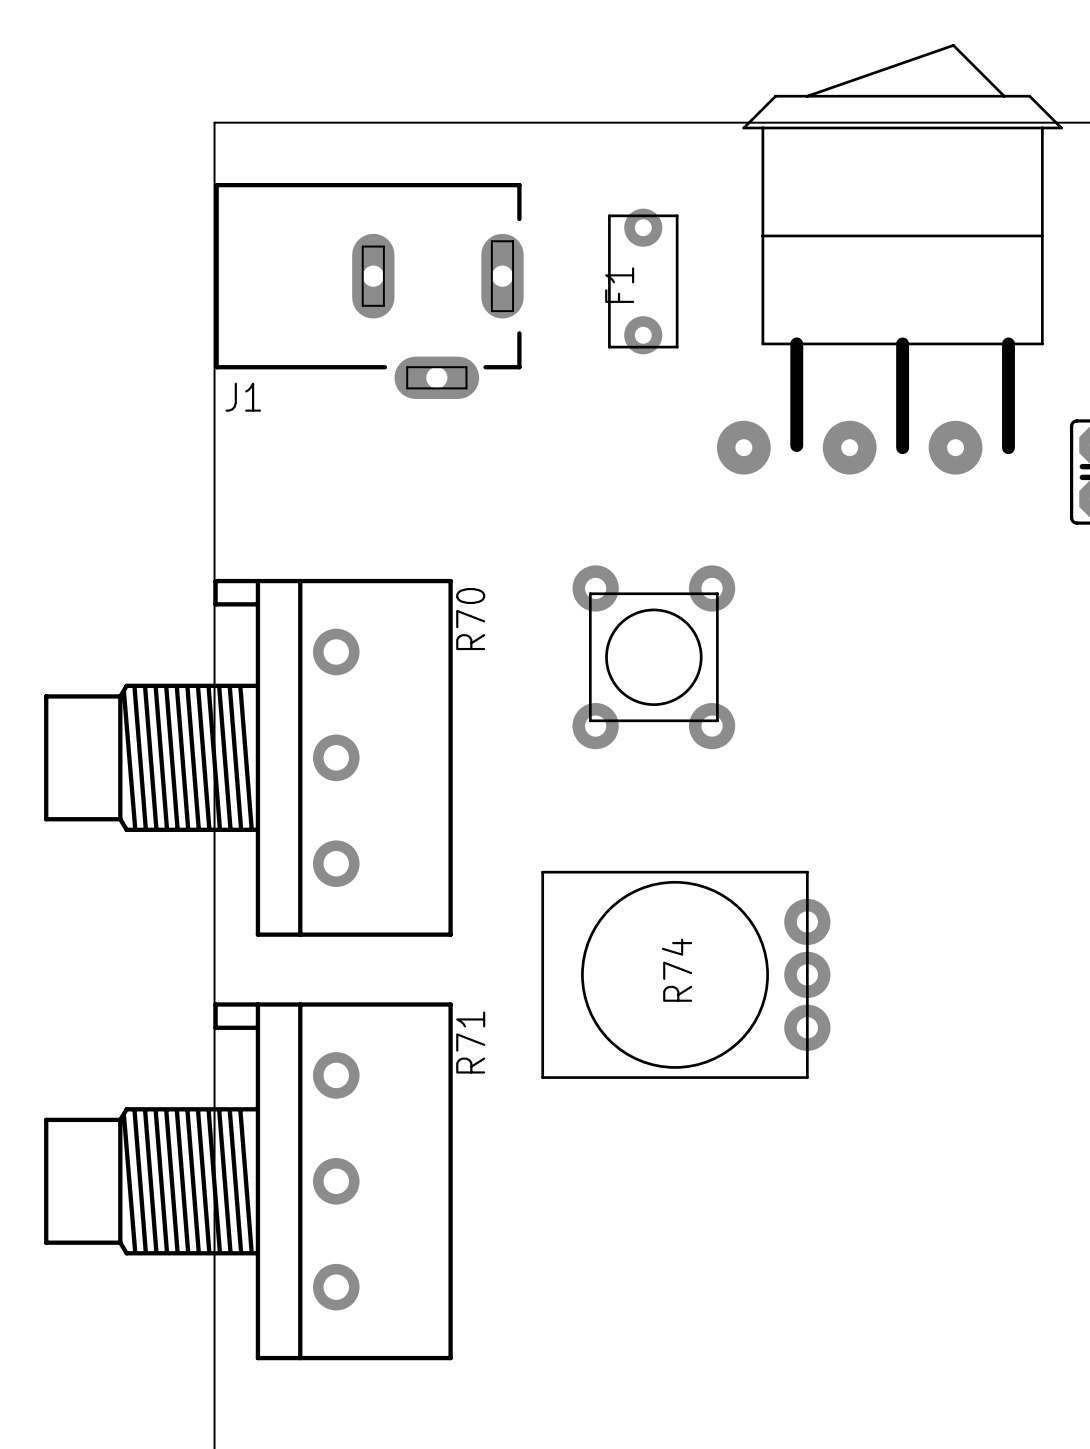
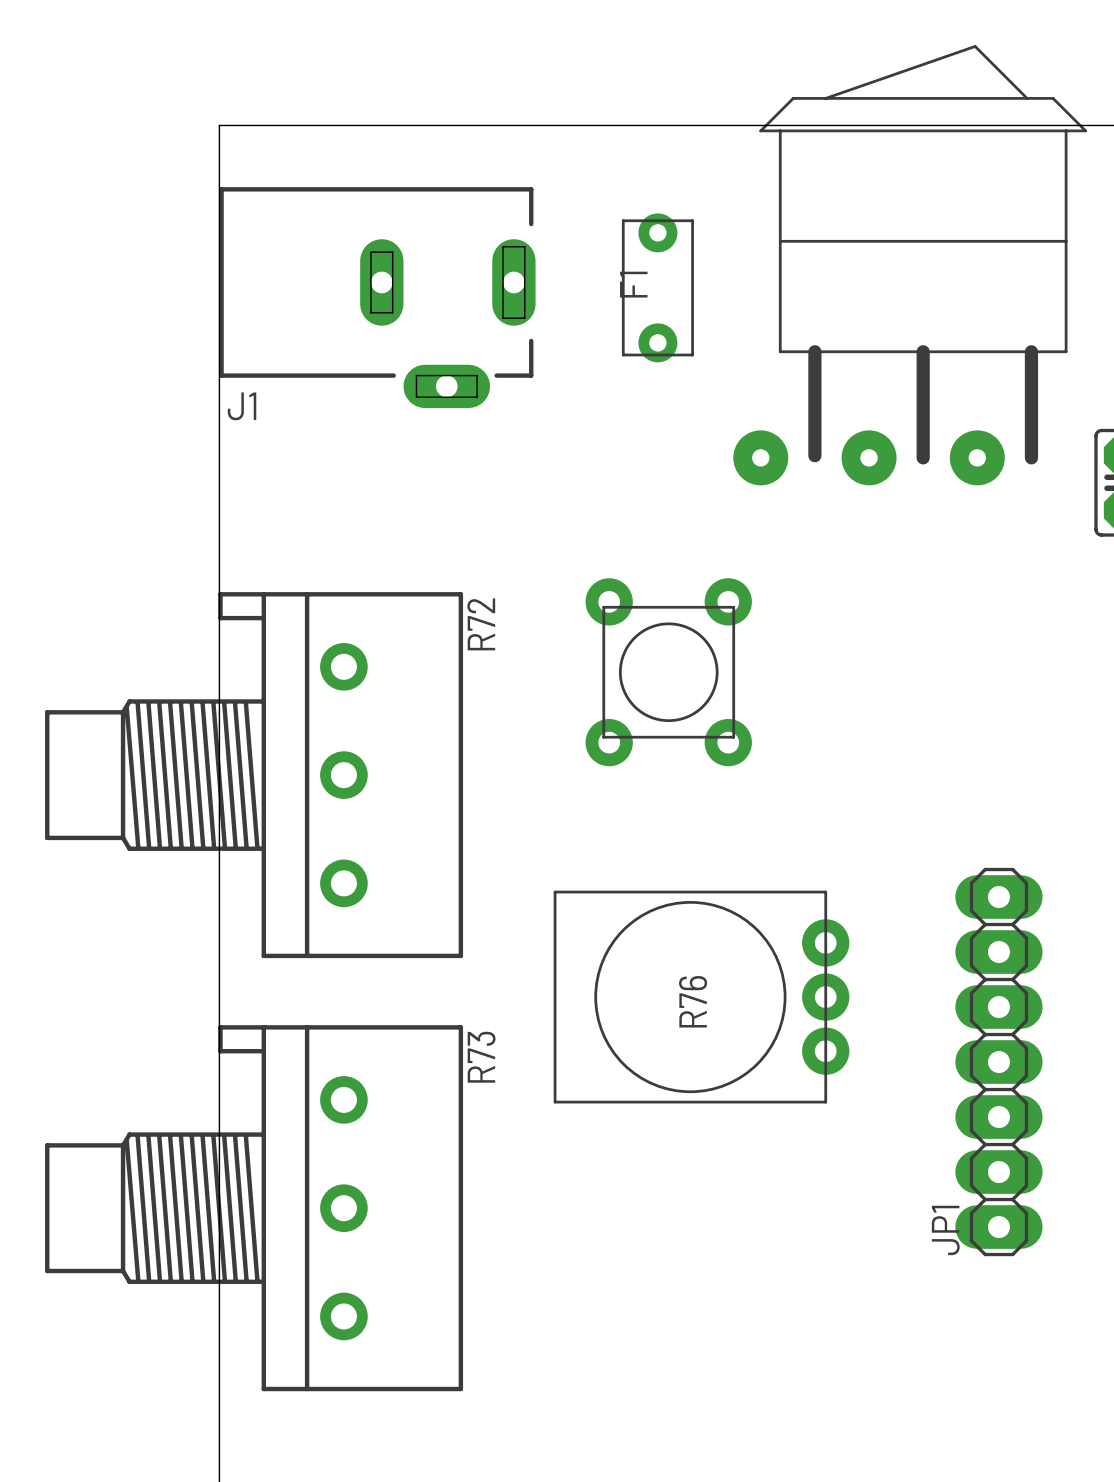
R70 name: R70 (470, 619) -> R72 (481, 624)
R74 name: R74 (677, 970) -> R76 (693, 1001)
JP1: none -> (998, 1062)
R71 name: R71 (470, 1042) -> R73 (481, 1057)

